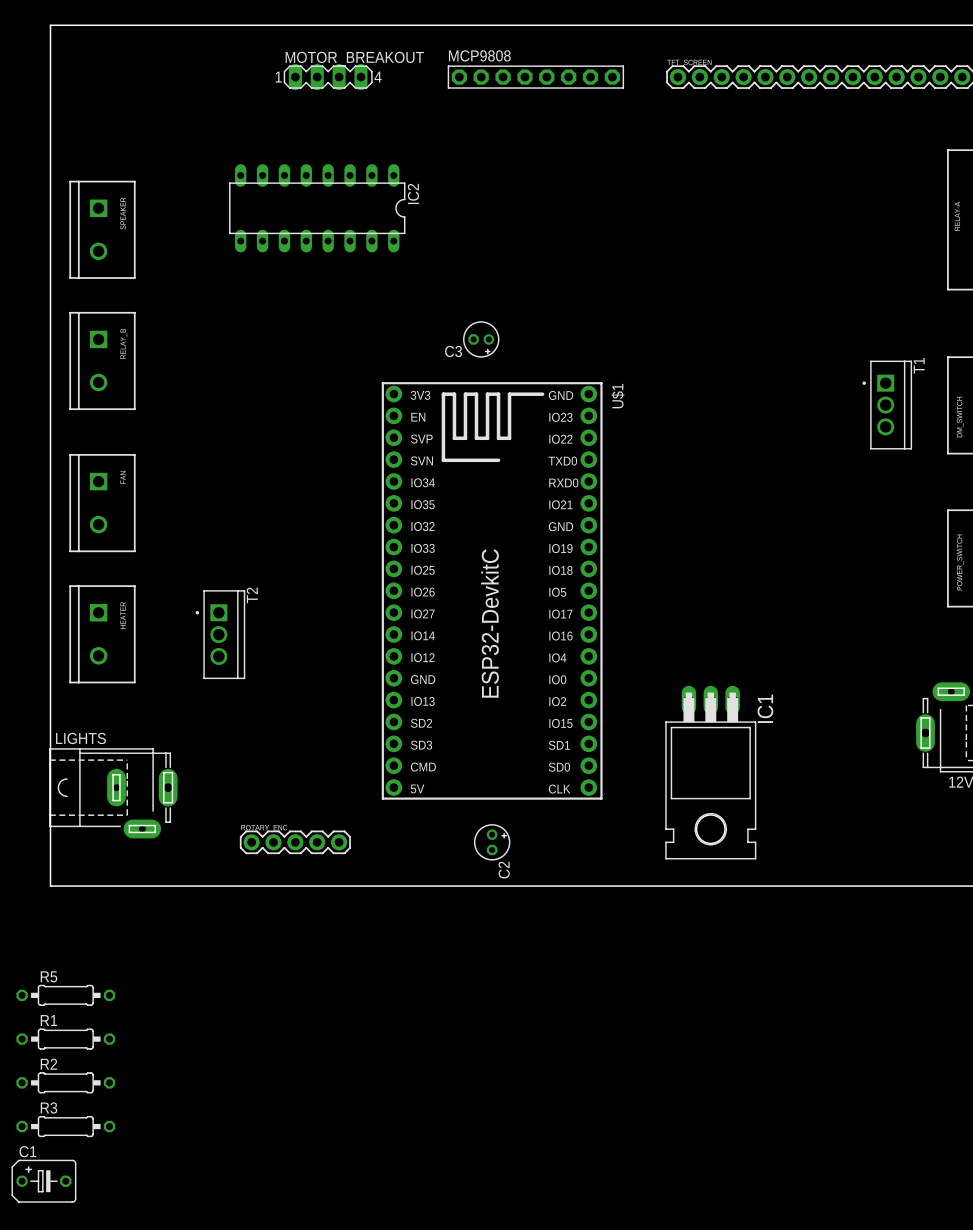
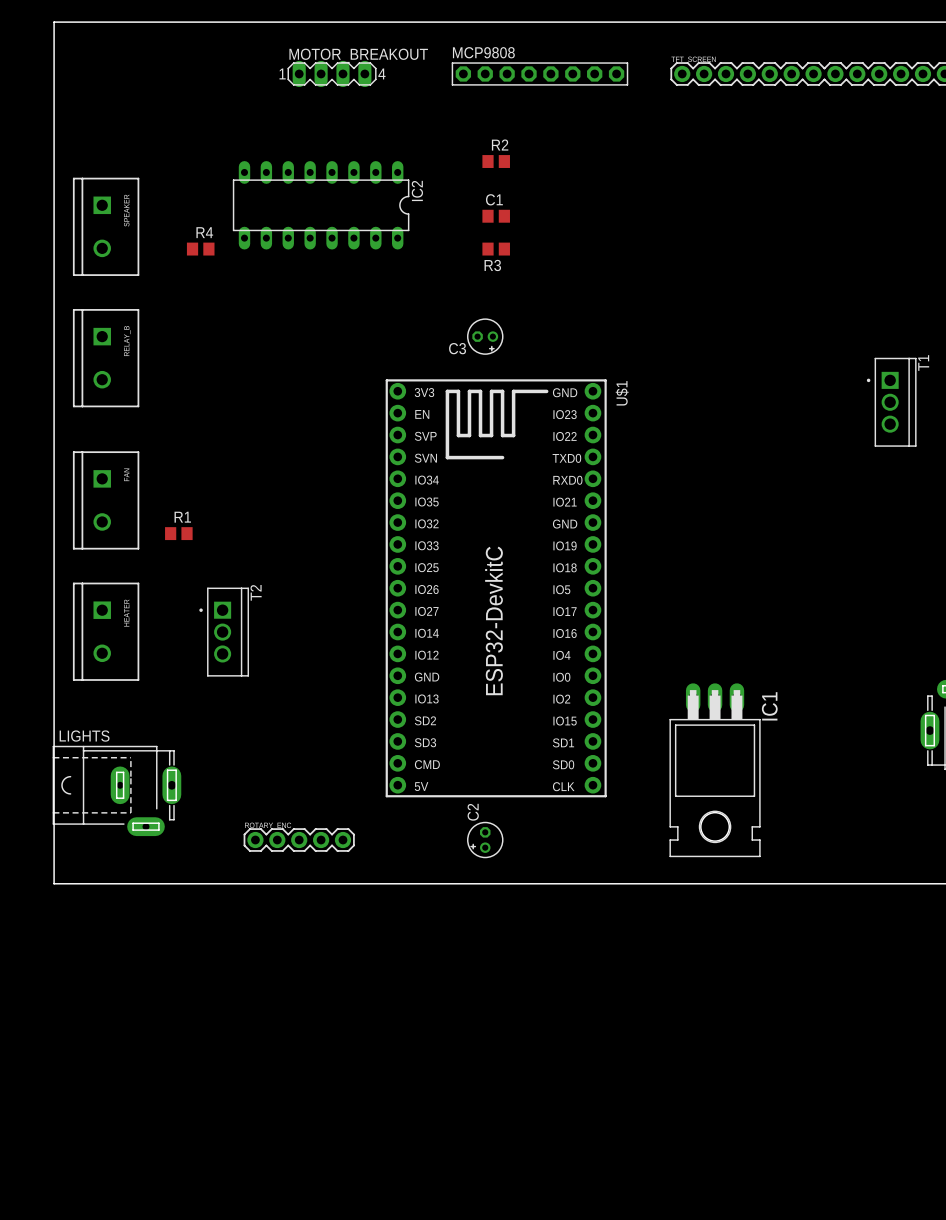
R4: none -> (200, 249)
C2 rotation: 0° (492, 842) -> 180° (485, 840)
R5: (65, 995) -> none
R1 name position: R1 (48, 1020) -> R1 (182, 517)
R1 footprint: [16, 1028, 116, 1050] -> [165, 527, 193, 541]
R2 name position: R2 (48, 1064) -> R2 (500, 145)
R2 footprint: [16, 1072, 116, 1094] -> [482, 155, 510, 168]
R3 name position: R3 (48, 1107) -> R3 (492, 265)
R3 footprint: [16, 1116, 116, 1138] -> [482, 242, 510, 256]
C1 name position: C1 (27, 1151) -> C1 (494, 199)
C1 footprint: [11, 1159, 77, 1203] -> [482, 209, 510, 223]

